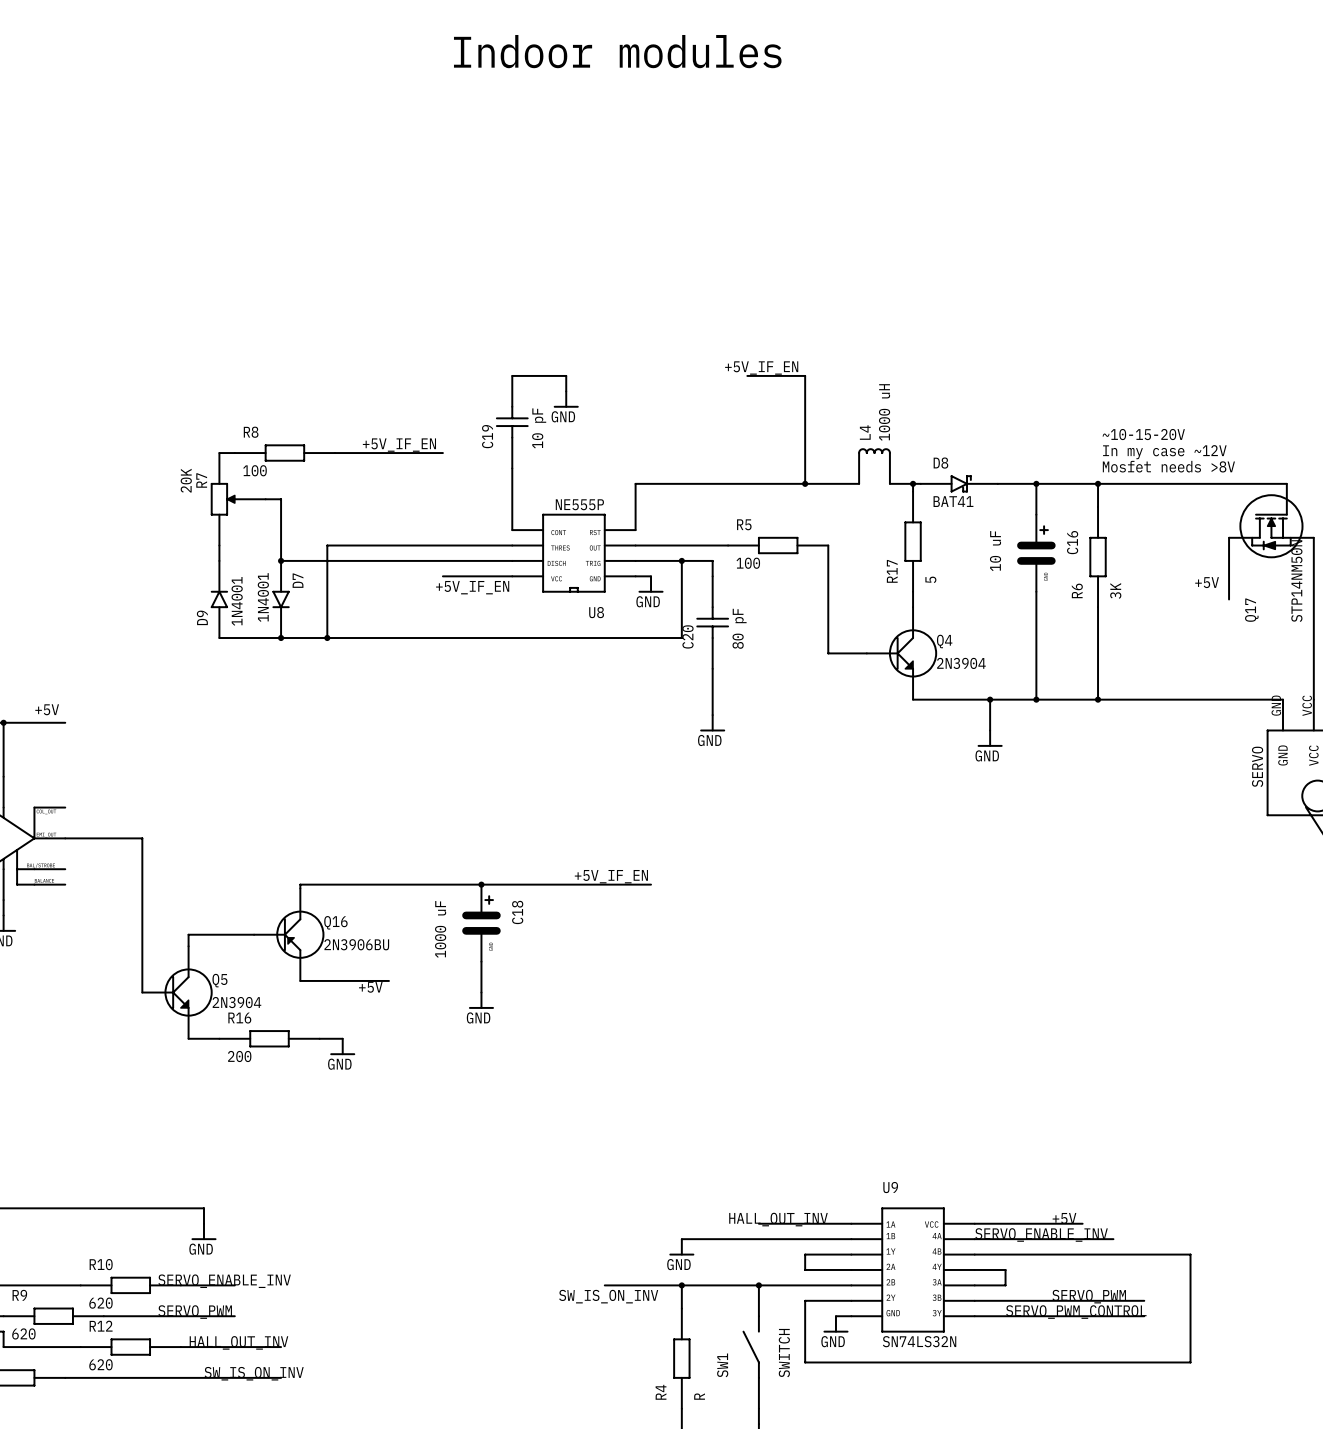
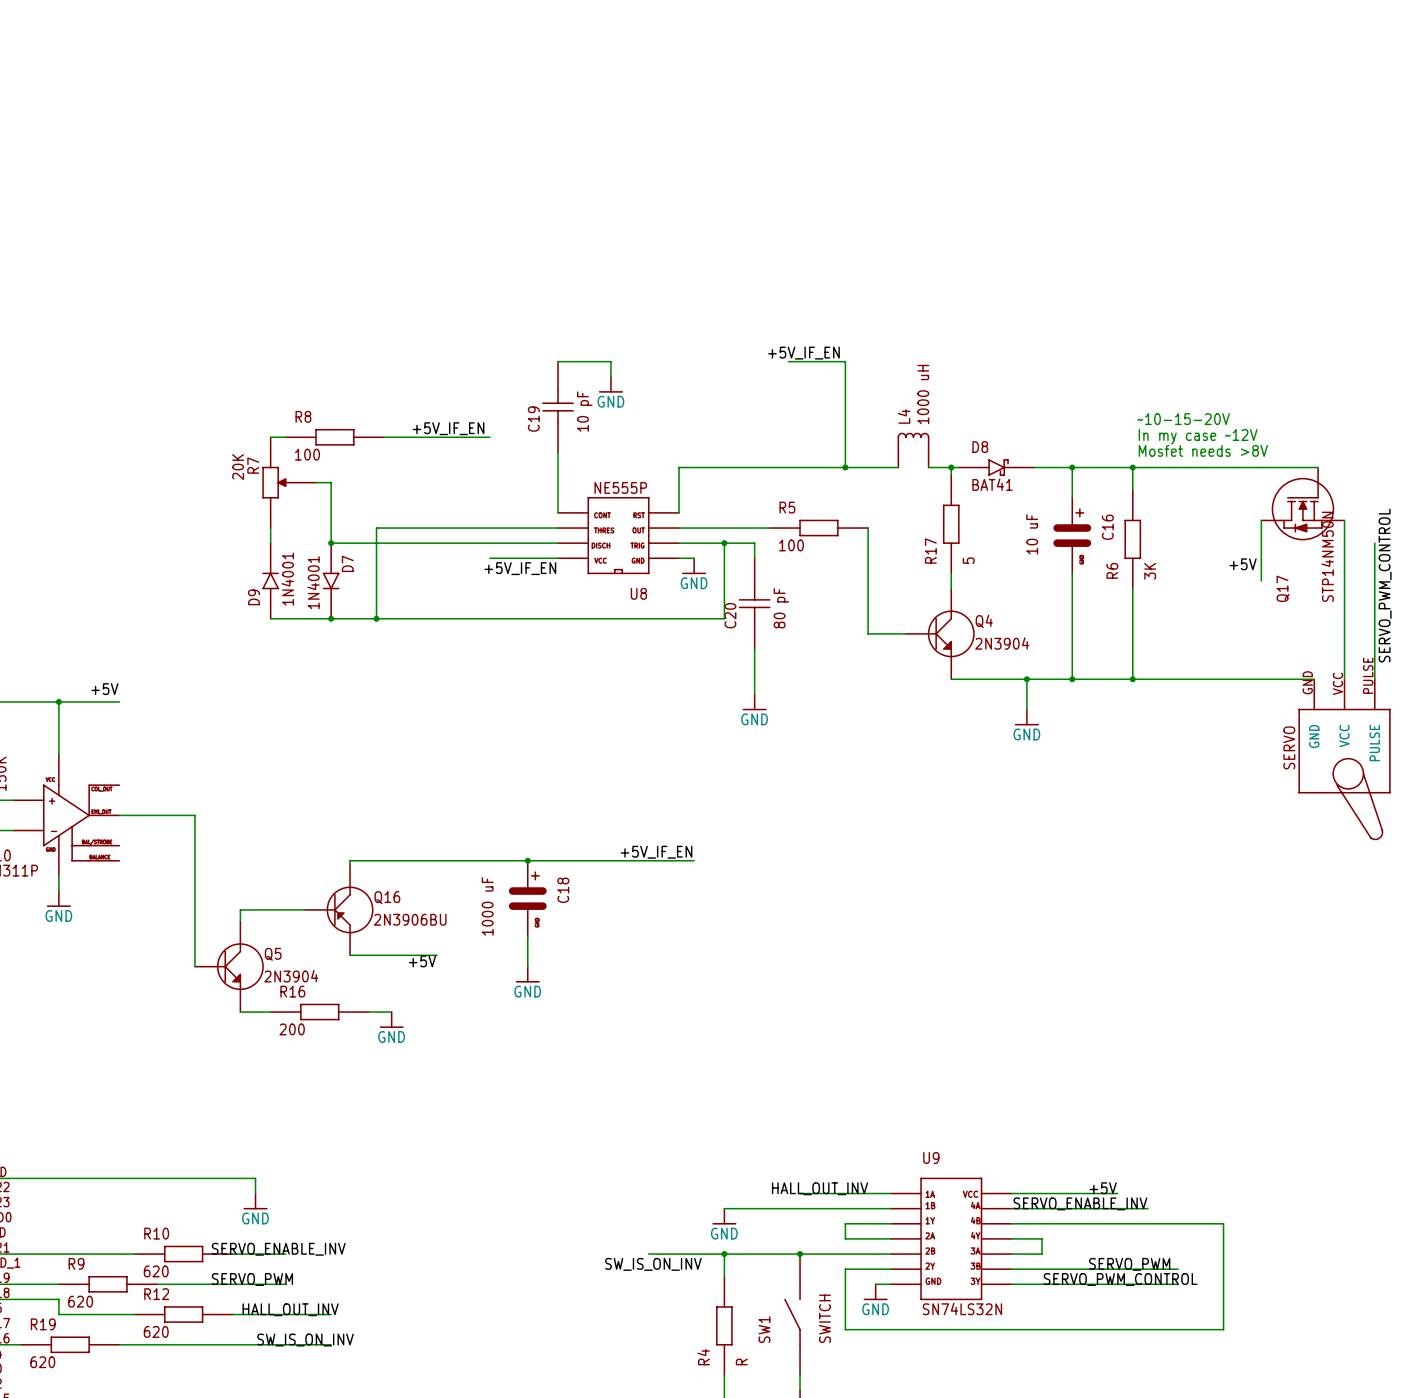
text: Indoor modules (617, 51) -> none

